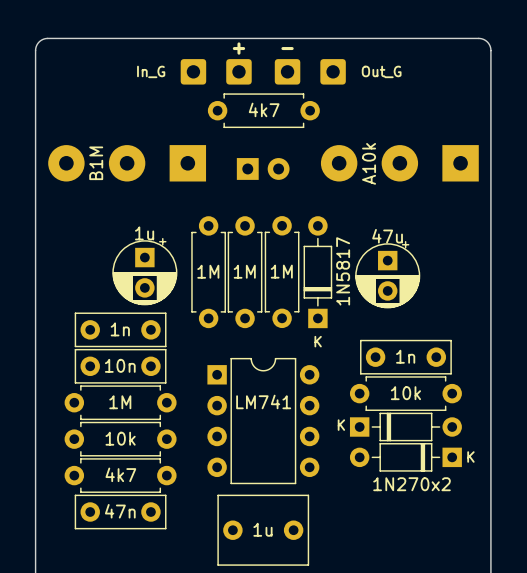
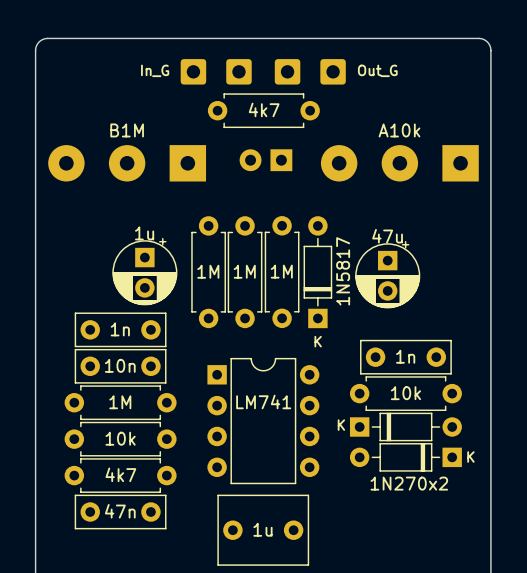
part name: + (238, 48) -> none
part name: - (287, 48) -> none
In_G value: none -> In_G (155, 70)
Out_G value: none -> Out_G (377, 70)
In_G name: In_G (151, 71) -> none
Out_G name: Out_G (381, 71) -> none
part value rotation: 0° (96, 163) -> 90° clockwise (127, 130)
part value rotation: 0° (369, 163) -> 90° clockwise (399, 130)
part rotation: 0° (263, 168) -> 180° (265, 160)
part text: none -> 1N270x2 (409, 483)
part value: 1N270x2 (412, 484) -> none

